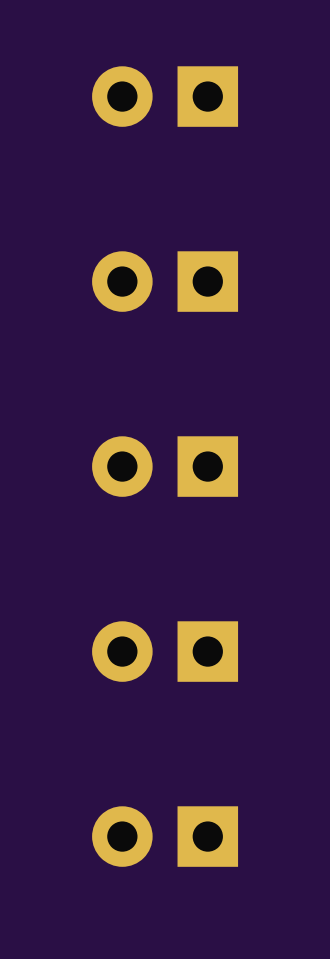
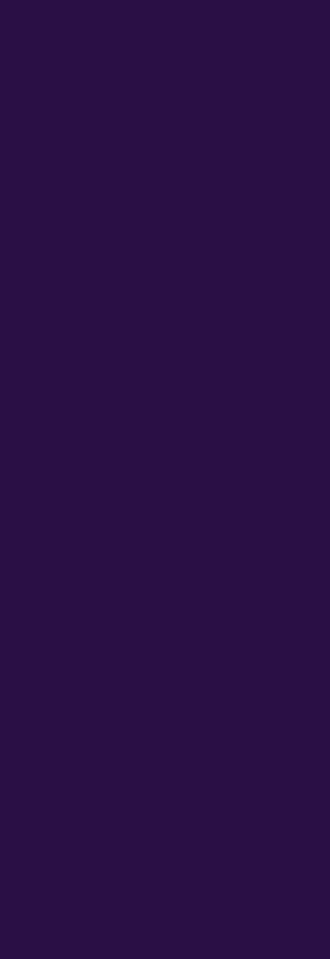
part: (165, 96) -> none
part: (165, 281) -> none
part: (165, 466) -> none
part: (165, 651) -> none
part: (165, 836) -> none

